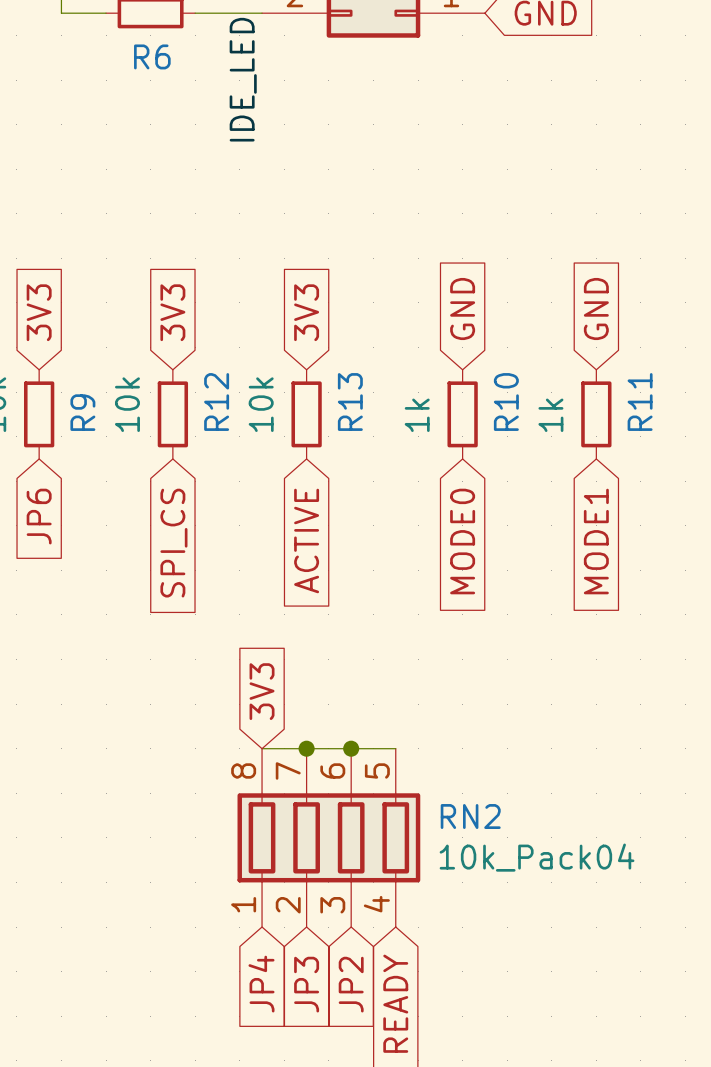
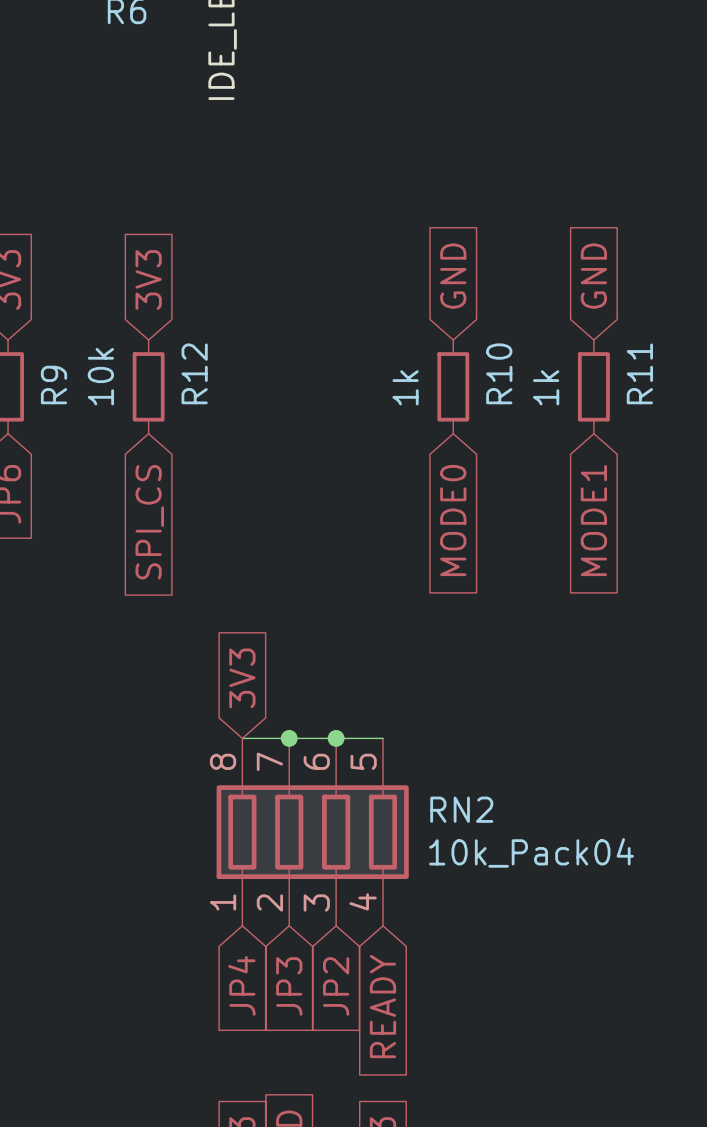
global label: 3V3 (306, 312) -> none
R13: 10k (306, 414) -> none
global label: ACTIVE (306, 540) -> none

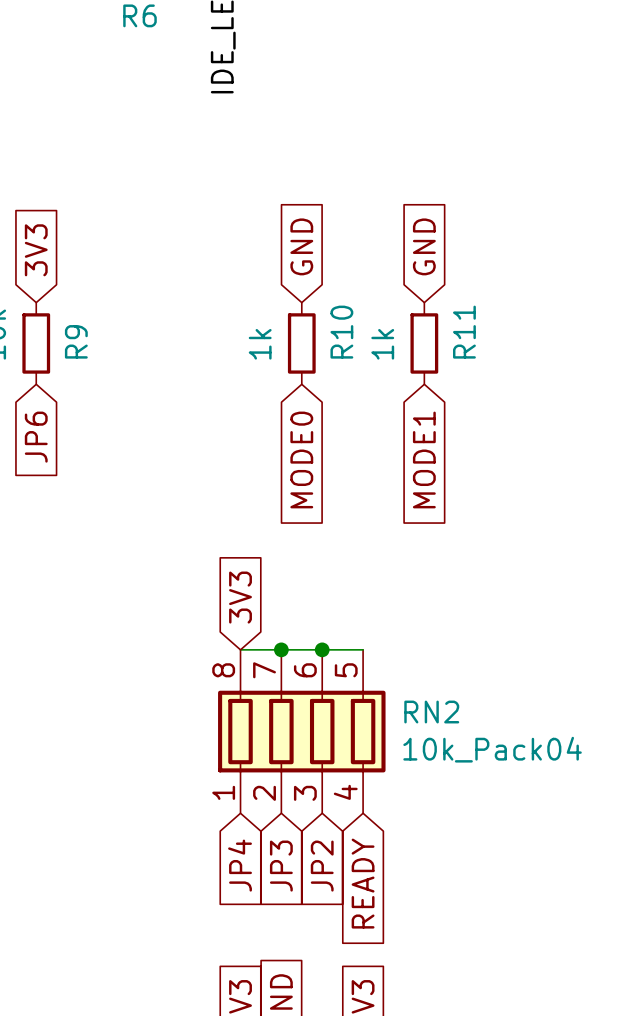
global label position: GND (593, 276) -> GND (301, 246)
global label: 3V3 (148, 279) -> none
R10 name: R10 (499, 373) -> R11 (464, 332)
R12: 10k (148, 386) -> none
R10: none -> 1k (301, 343)
R11: 1k (593, 386) -> none
global label: none -> MODE0 (301, 459)
global label: MODE0 (453, 520) -> MODE1 (424, 459)
global label: MODE1 (593, 520) -> none
global label: SPI_CS (149, 522) -> none

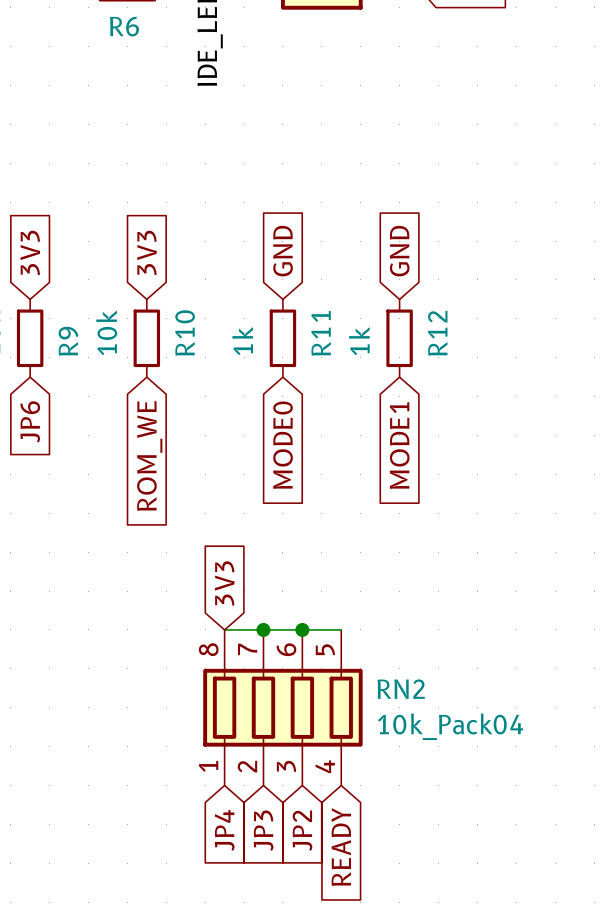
global label: none -> 3V3 (146, 252)
R10 name: R10 (341, 332) -> R11 (321, 333)
R11 name: R11 (464, 332) -> R12 (437, 333)
R10: none -> 10k (146, 338)
global label: none -> ROM_WE (149, 455)

